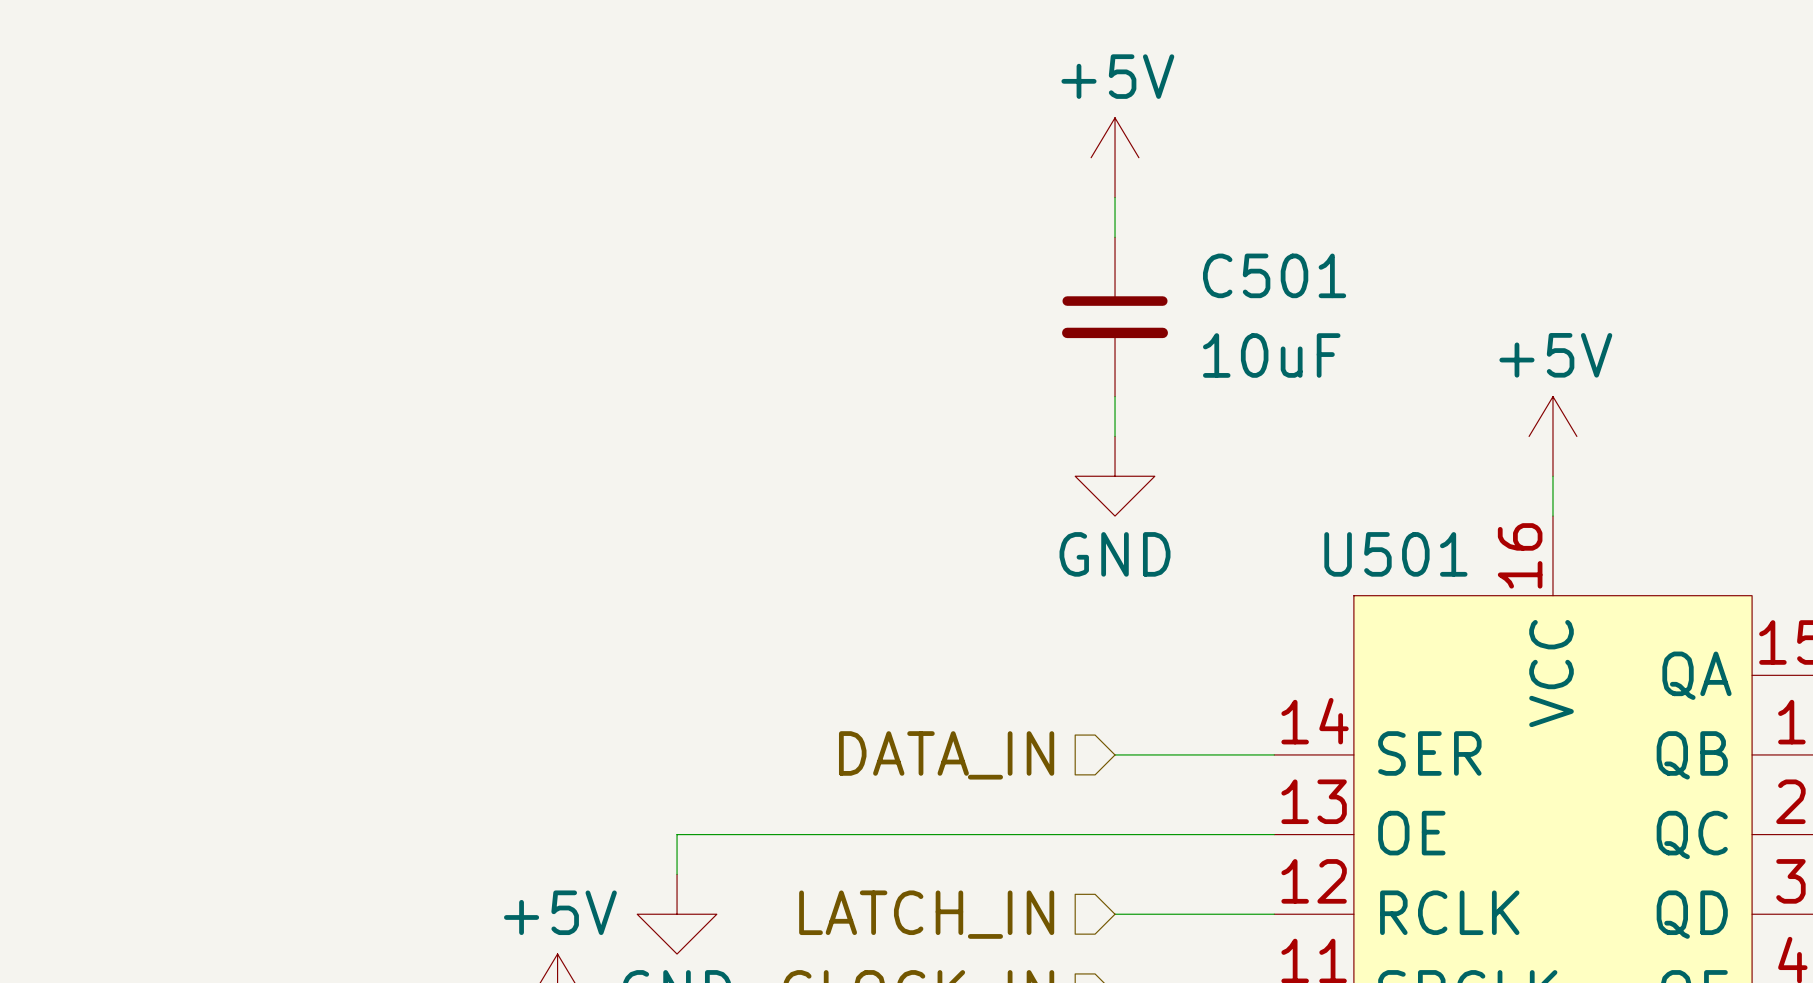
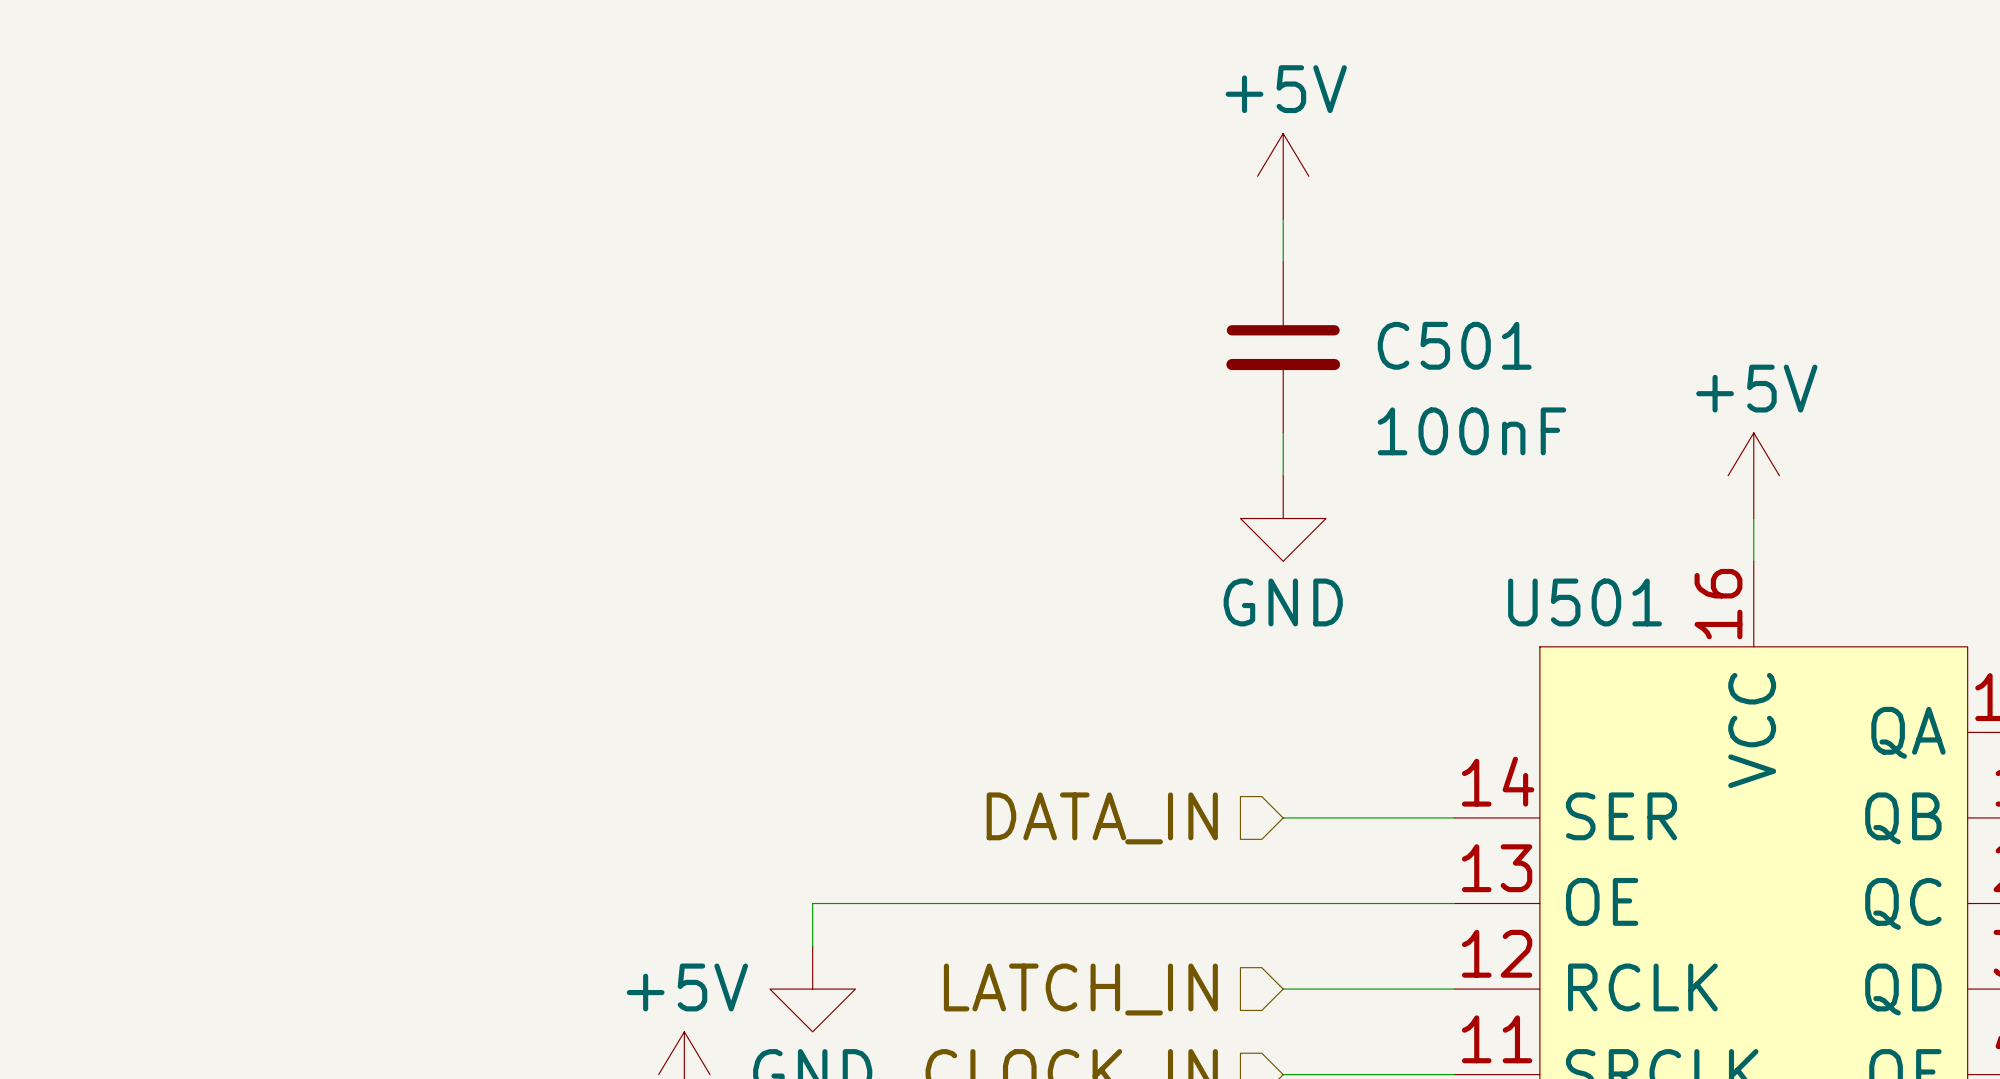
C501 name position: C501 (1274, 275) -> C501 (1454, 345)
C501 value: 10uF (1271, 355) -> 100nF (1471, 431)

